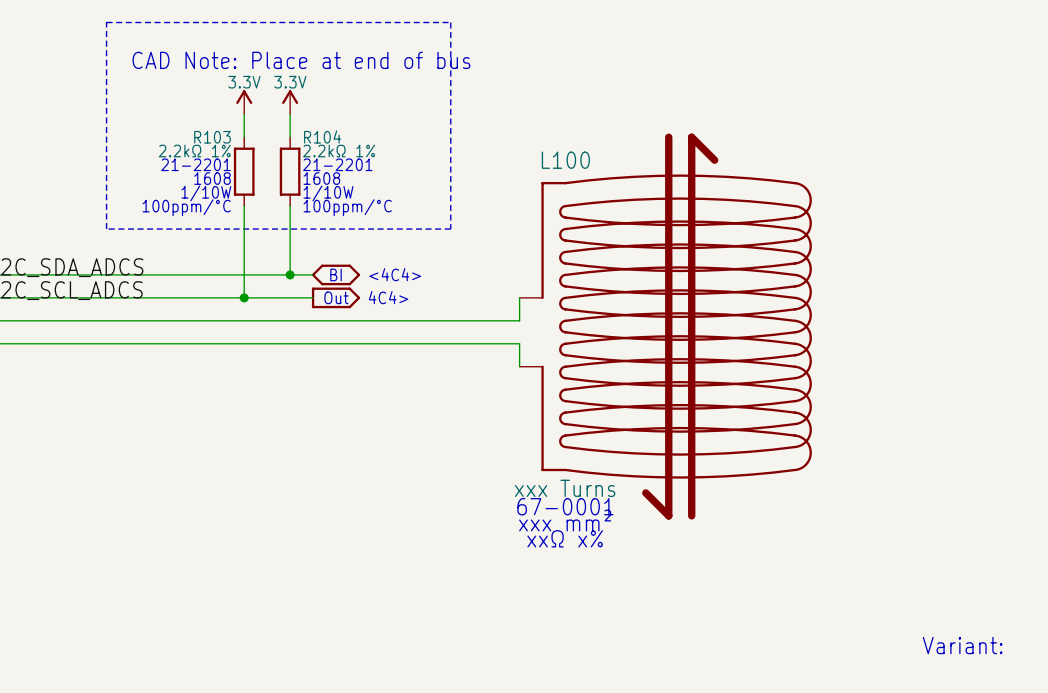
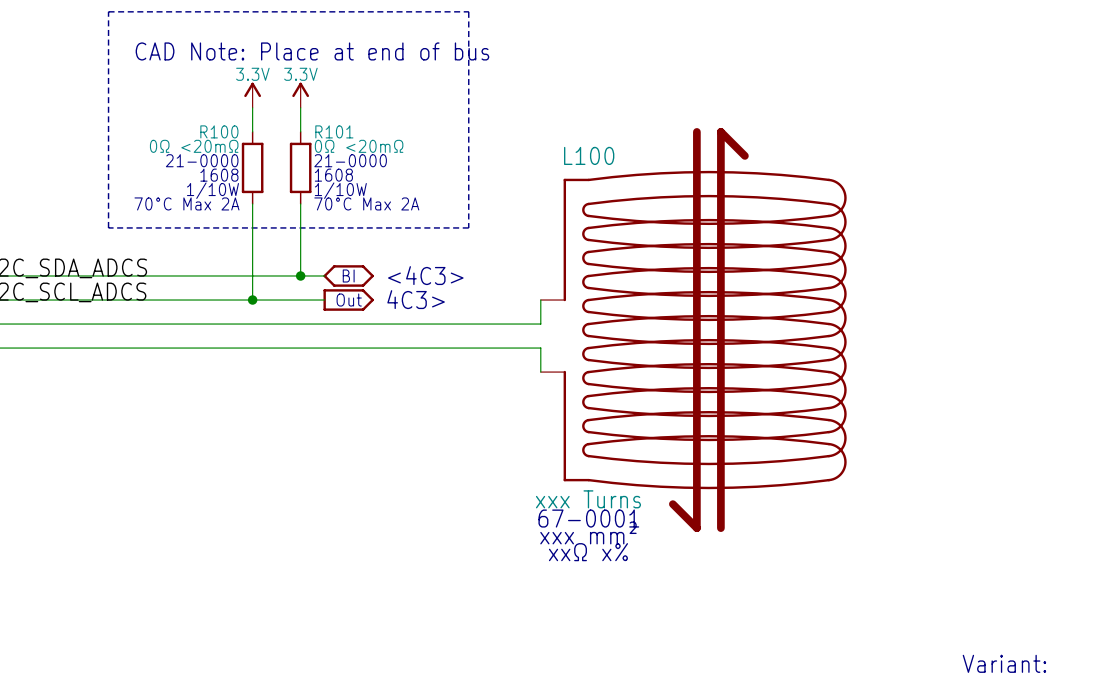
R104 name: R104 (322, 136) -> R101 (334, 131)
R103 name: R103 (212, 137) -> R100 (219, 131)
R103 value: 2.2kΩ 1% (194, 151) -> 0Ω <20mΩ (194, 146)
R104 value: 2.2kΩ 1% (339, 151) -> 0Ω <20mΩ (359, 146)
R103 text: 21-2201 (196, 164) -> 21-0000 (202, 160)
R104 text: 21-2201 (337, 164) -> 21-0000 (350, 160)
R103 text: 100ppm/°C (186, 207) -> 70°C Max 2A (186, 203)
R104 text: 100ppm/°C (347, 207) -> 70°C Max 2A (366, 203)
text: <4C4> (395, 274) -> <4C3> (425, 275)
text: 4C4> (388, 297) -> 4C3> (416, 299)

